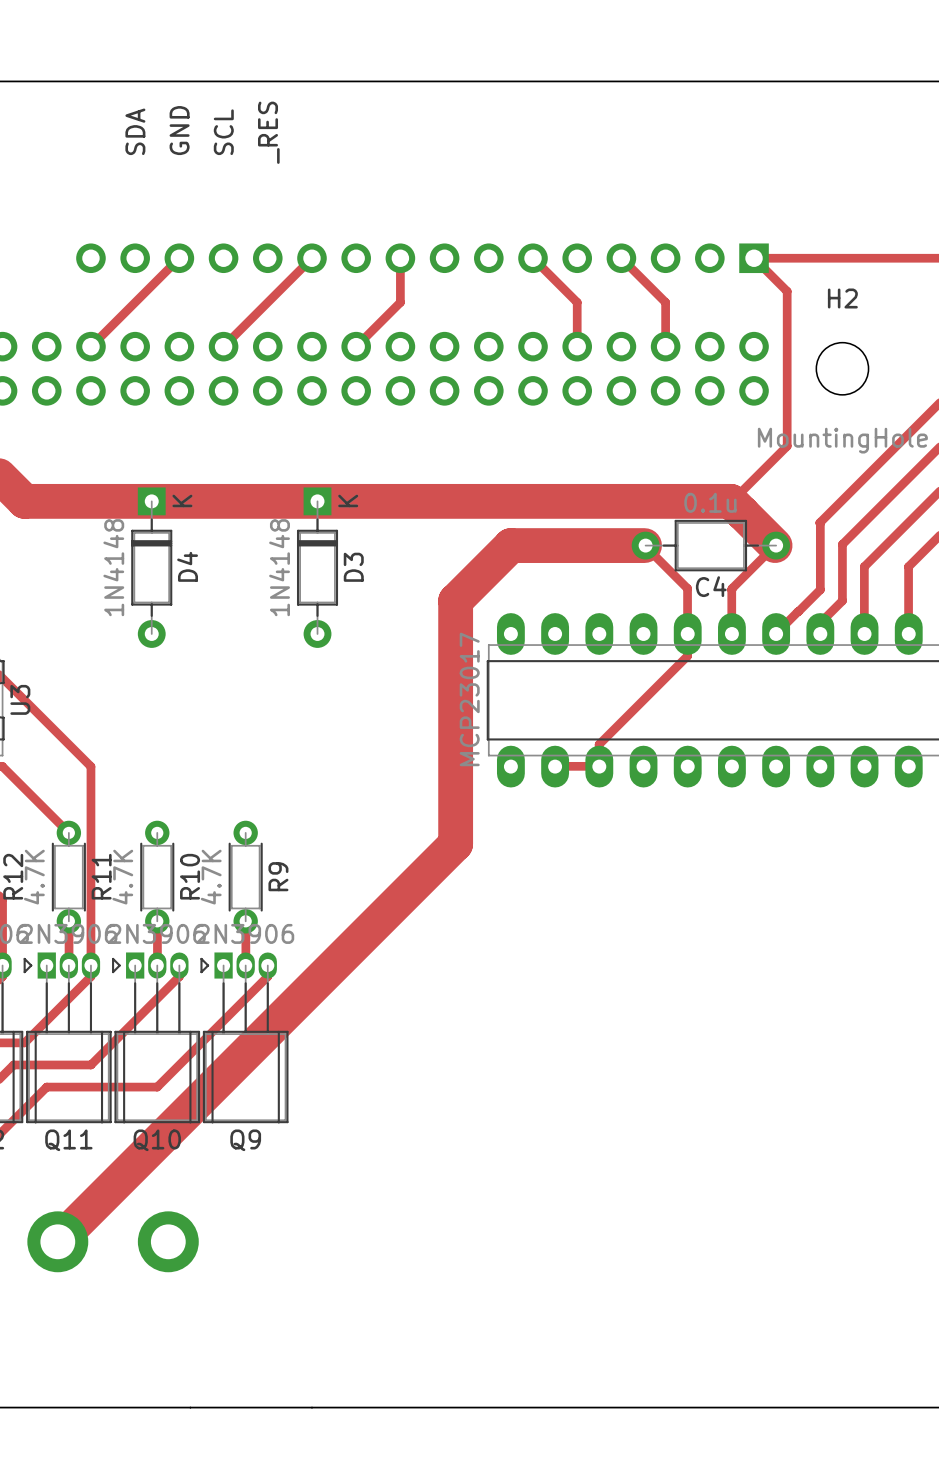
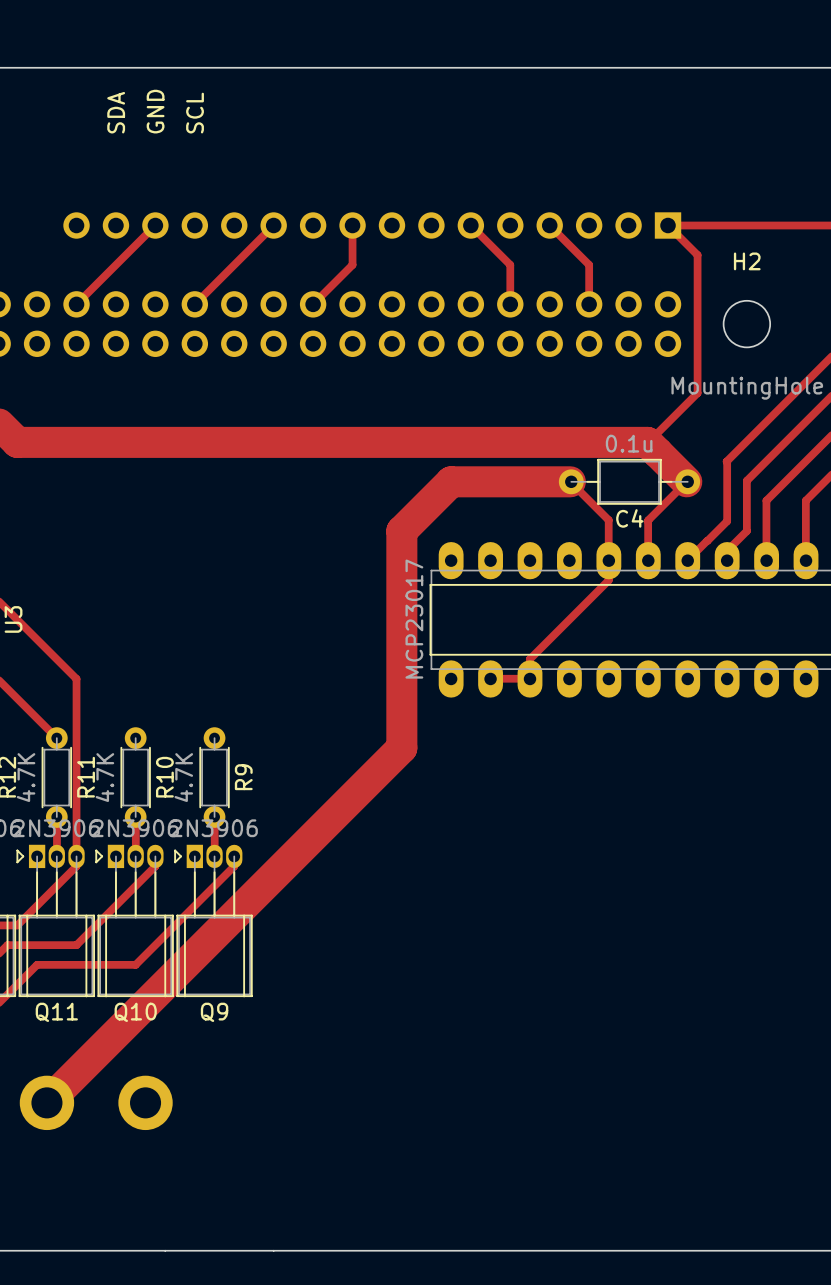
text: _RES (268, 132) -> none
D4: 1N4148 (151, 567) -> none
D3: 1N4148 (317, 567) -> none

